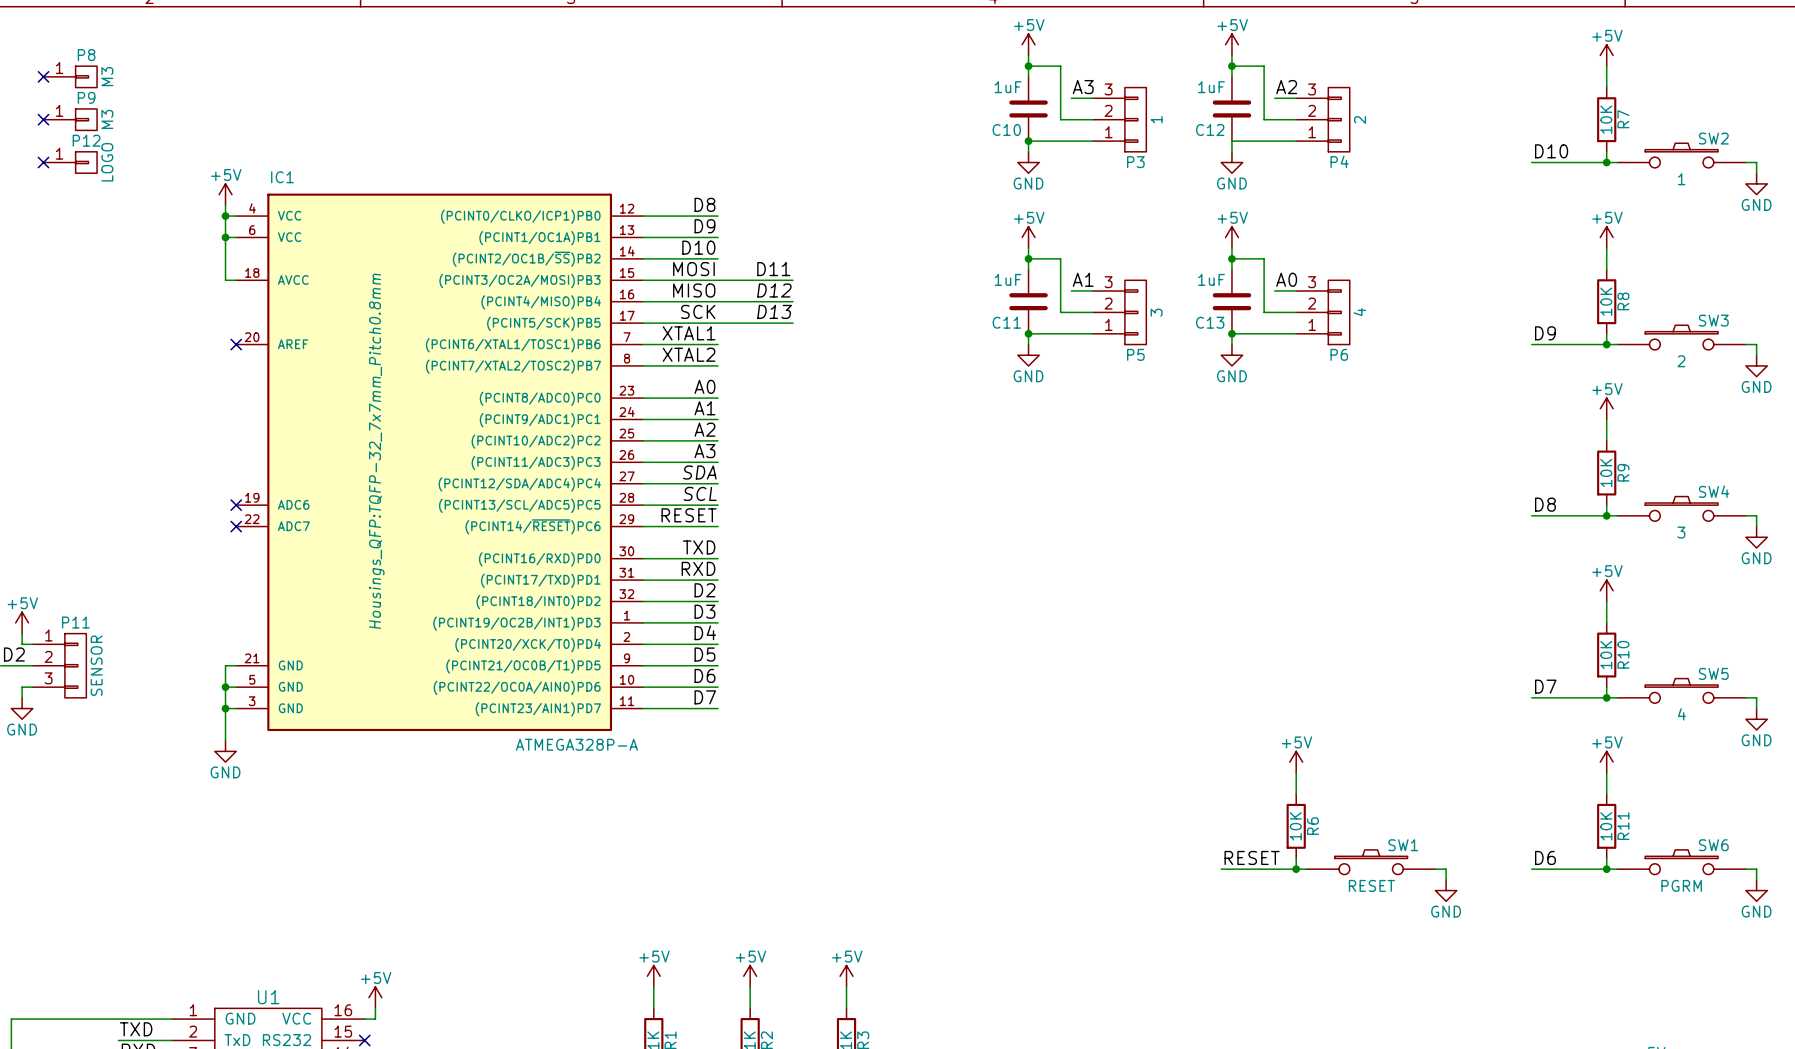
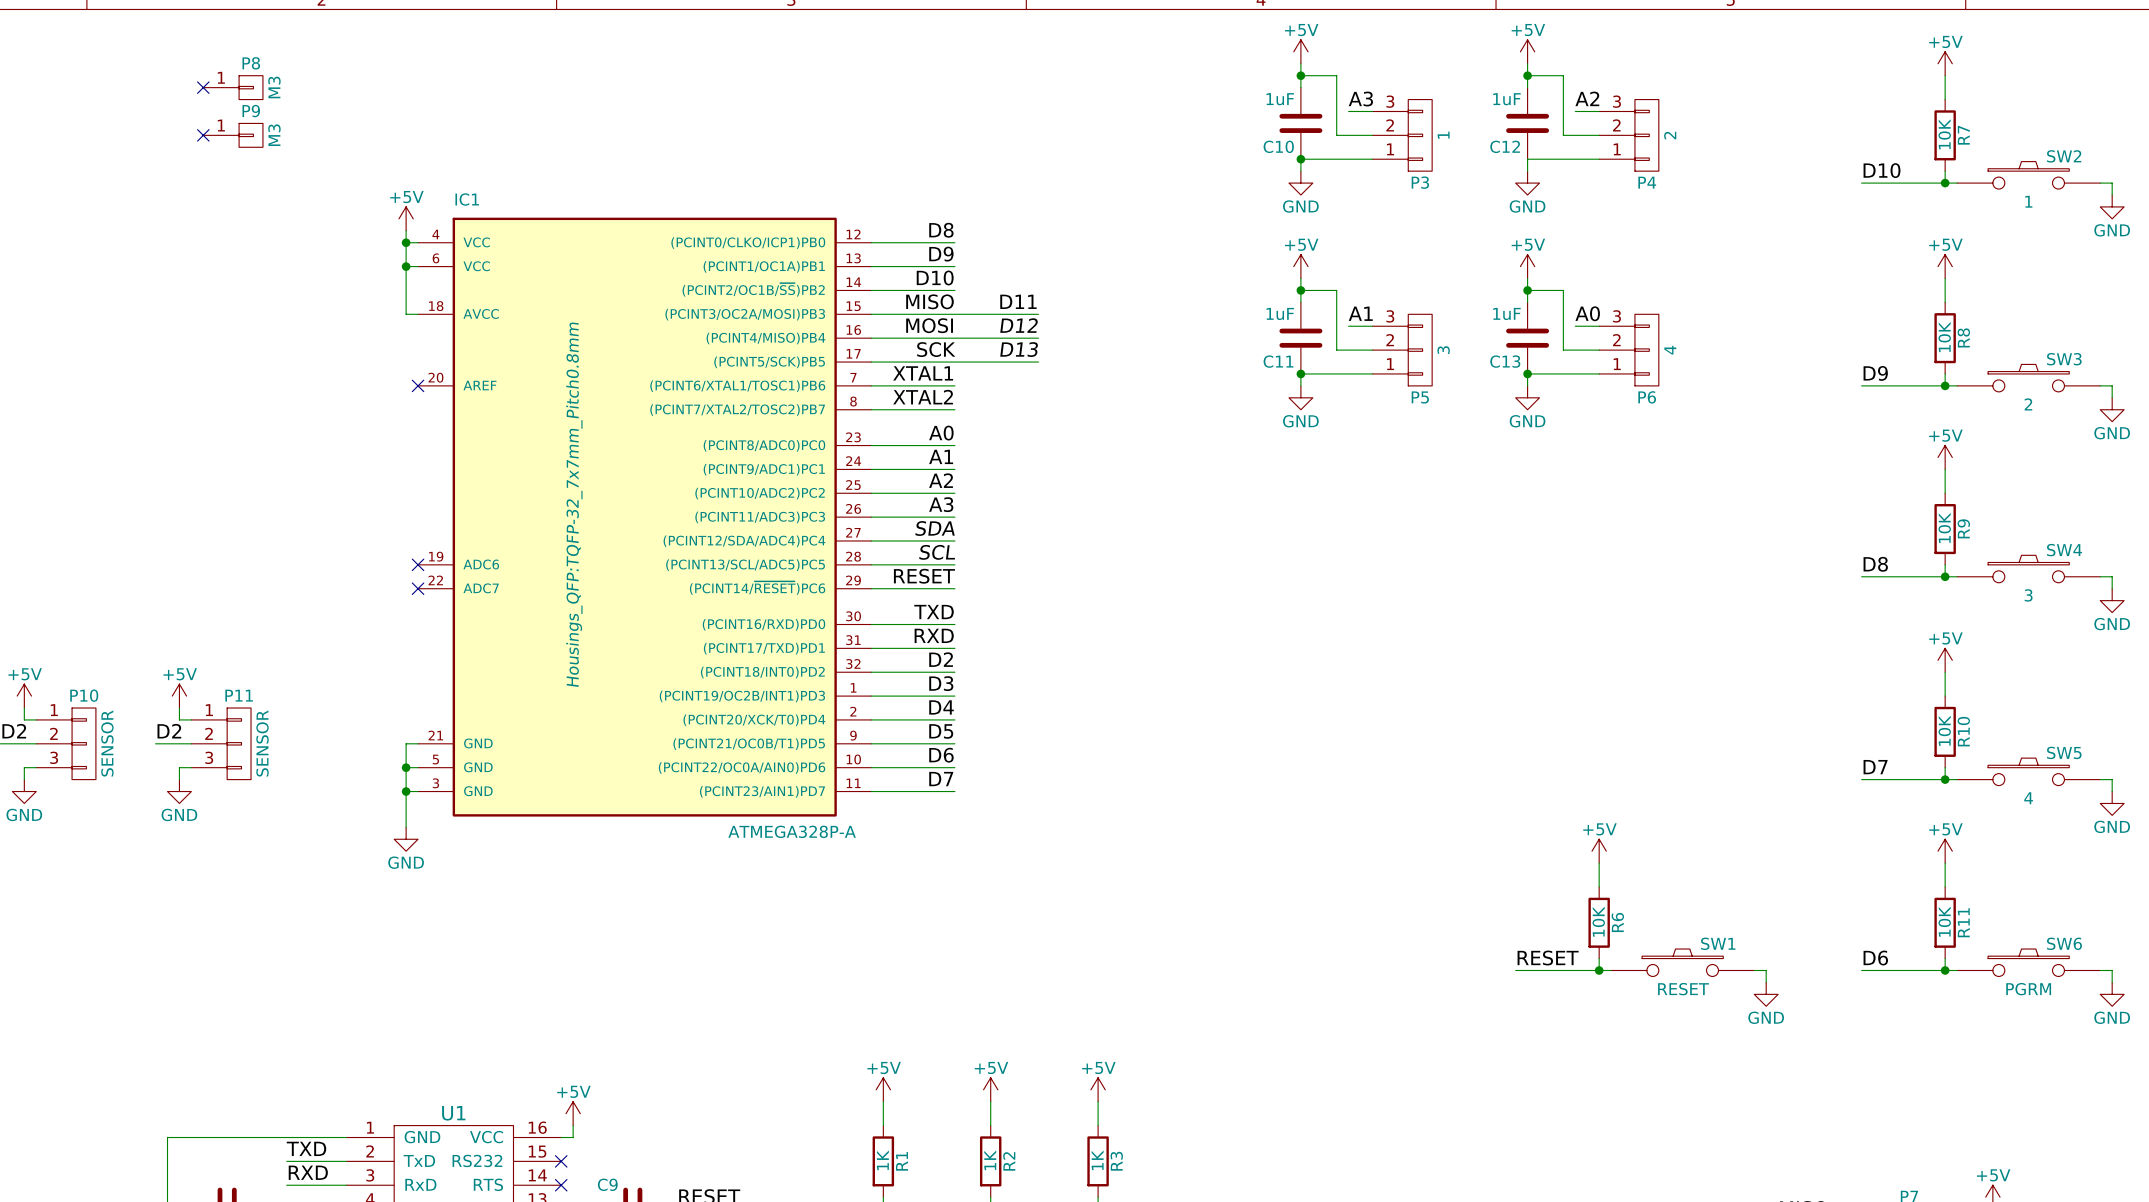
no-connect mark: (43, 162) -> none
P12: LOGO (70, 162) -> none
label: MOSI (693, 269) -> MISO (930, 301)
label: MISO (694, 290) -> MOSI (929, 325)

